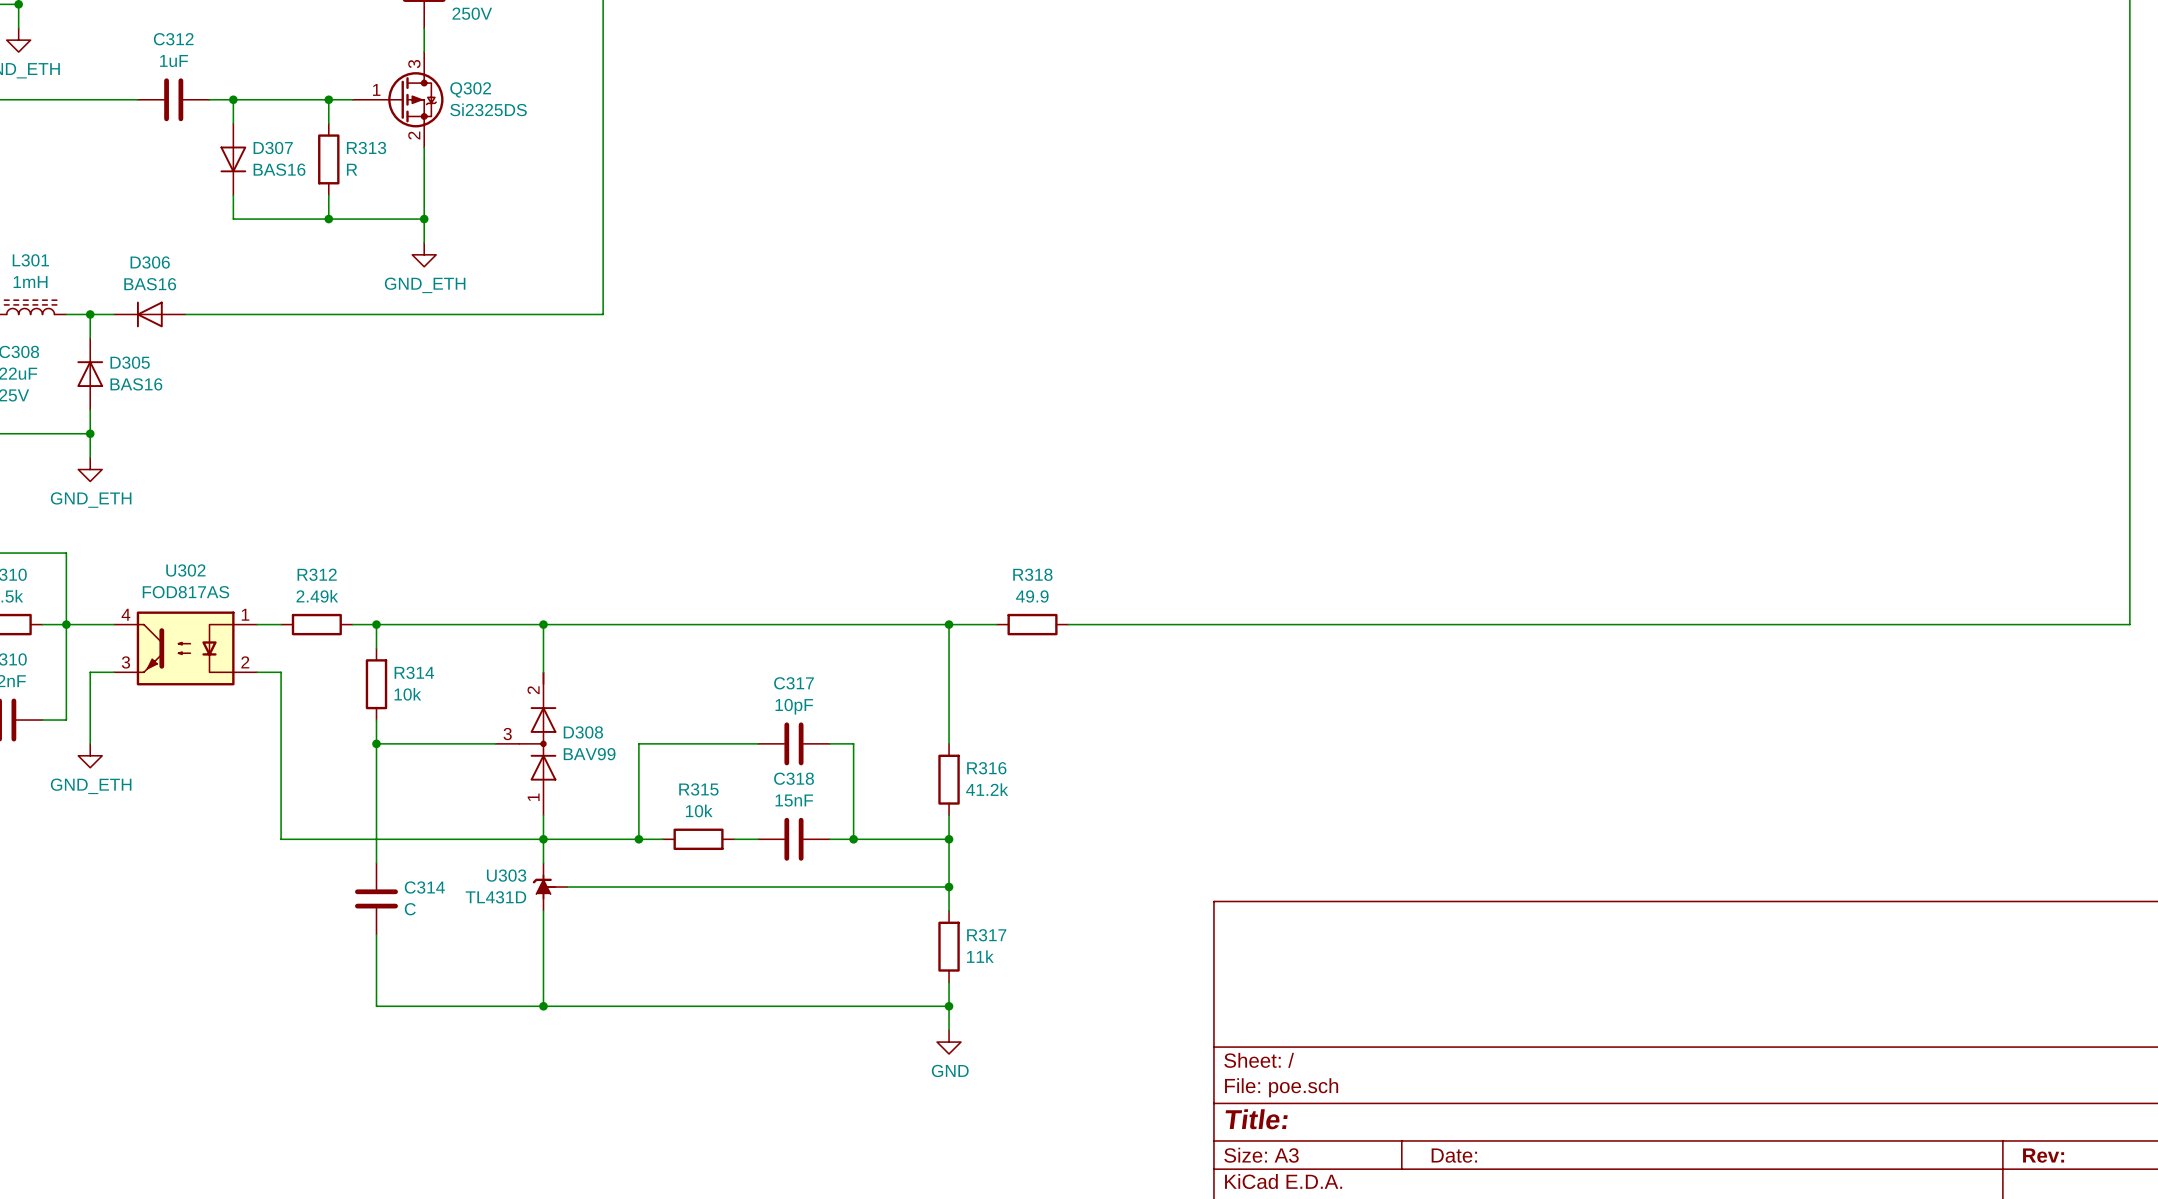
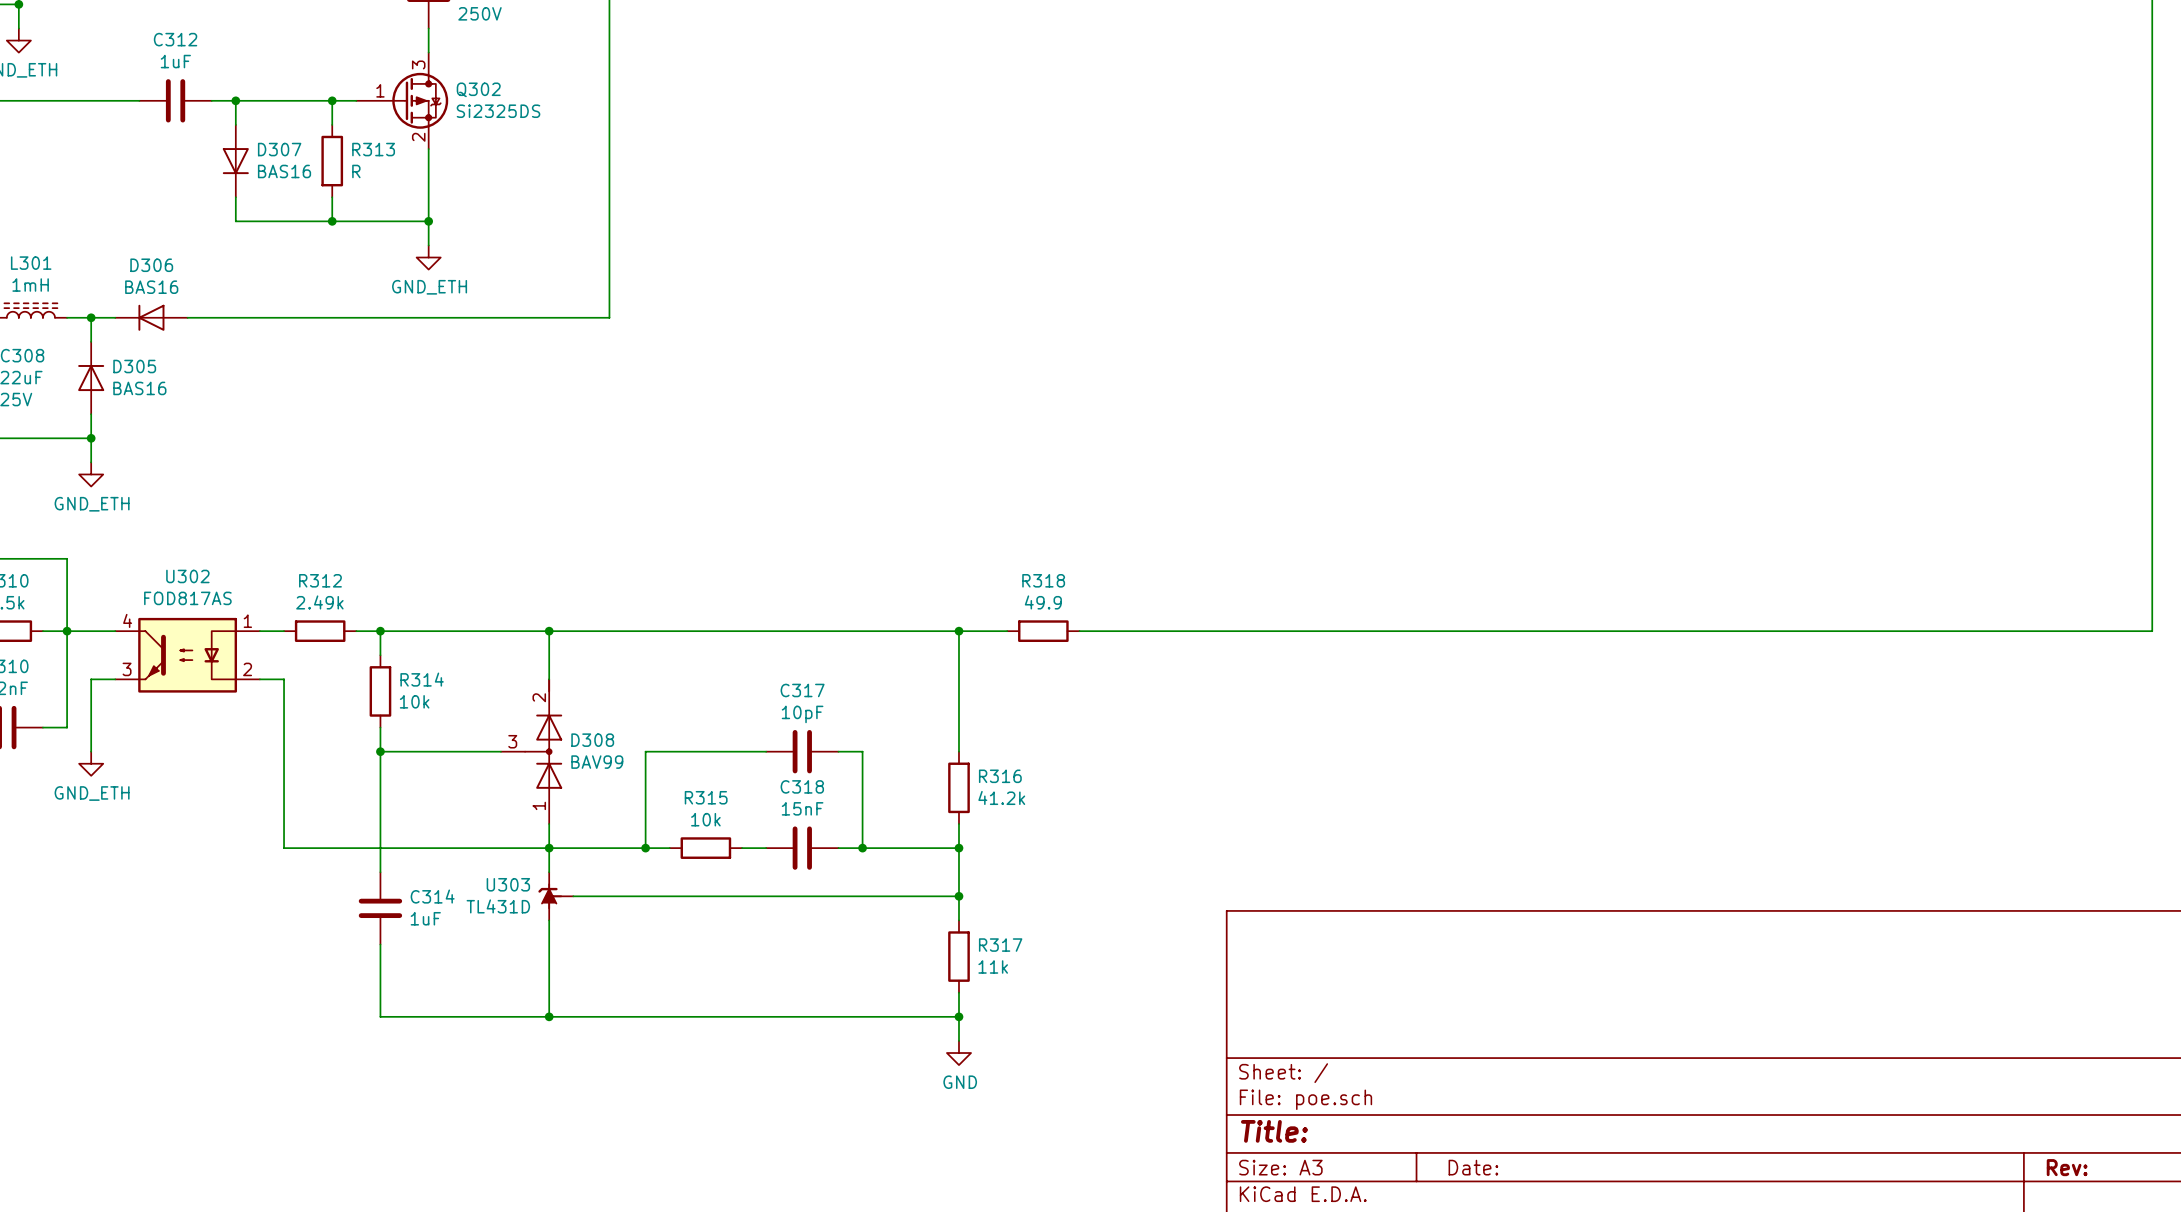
C314 value: C (410, 909) -> 1uF (425, 918)

